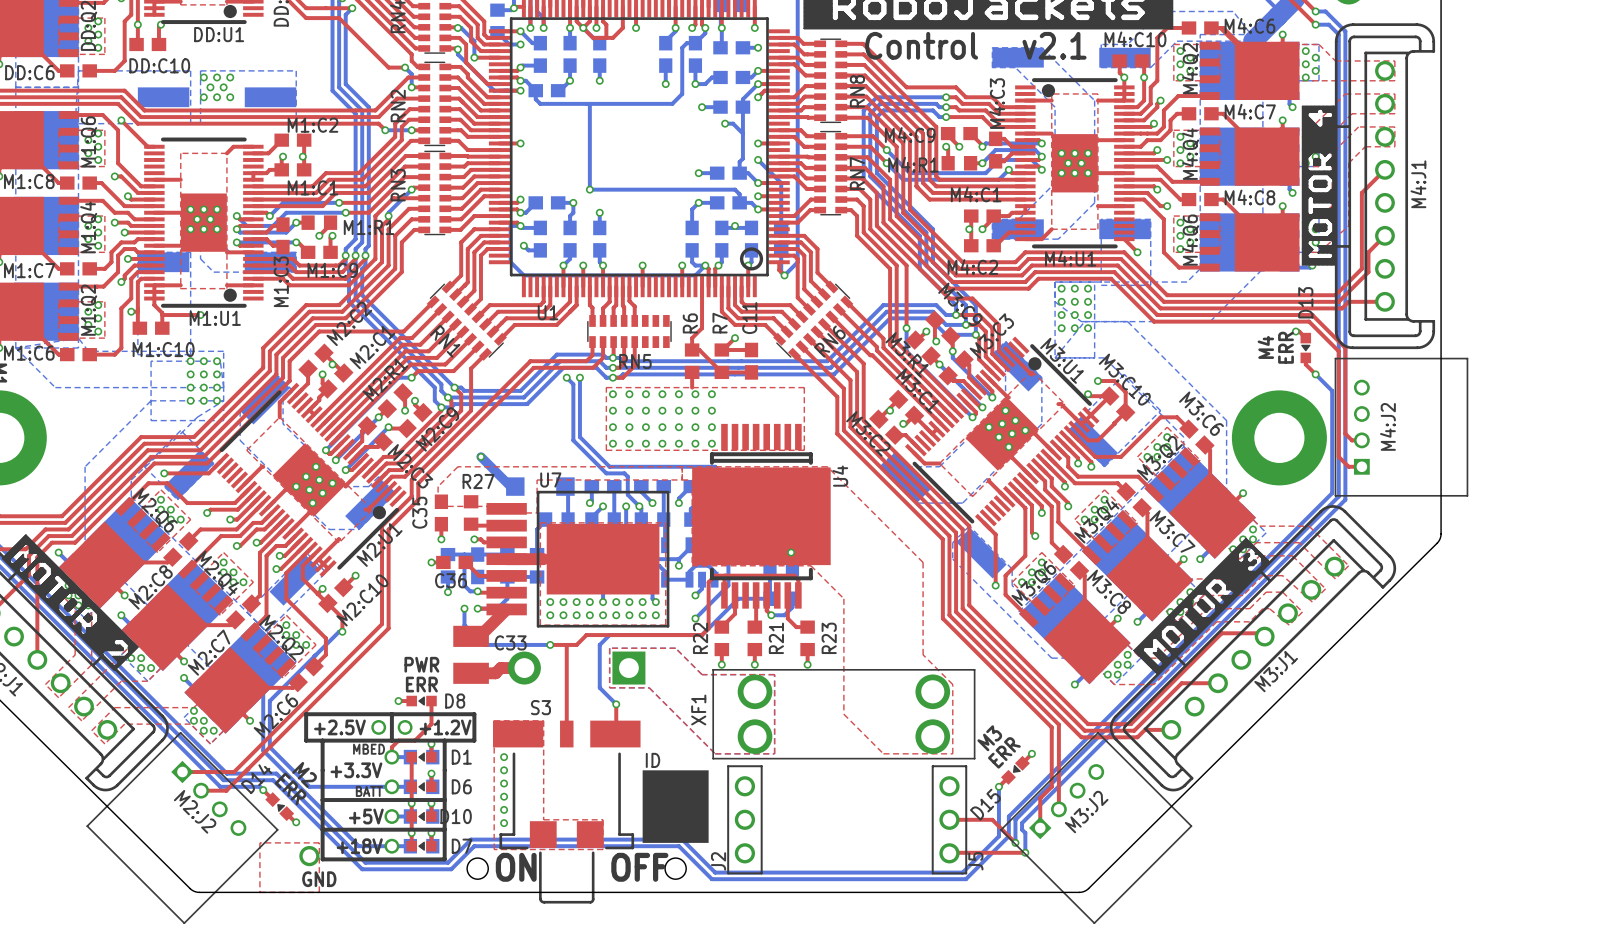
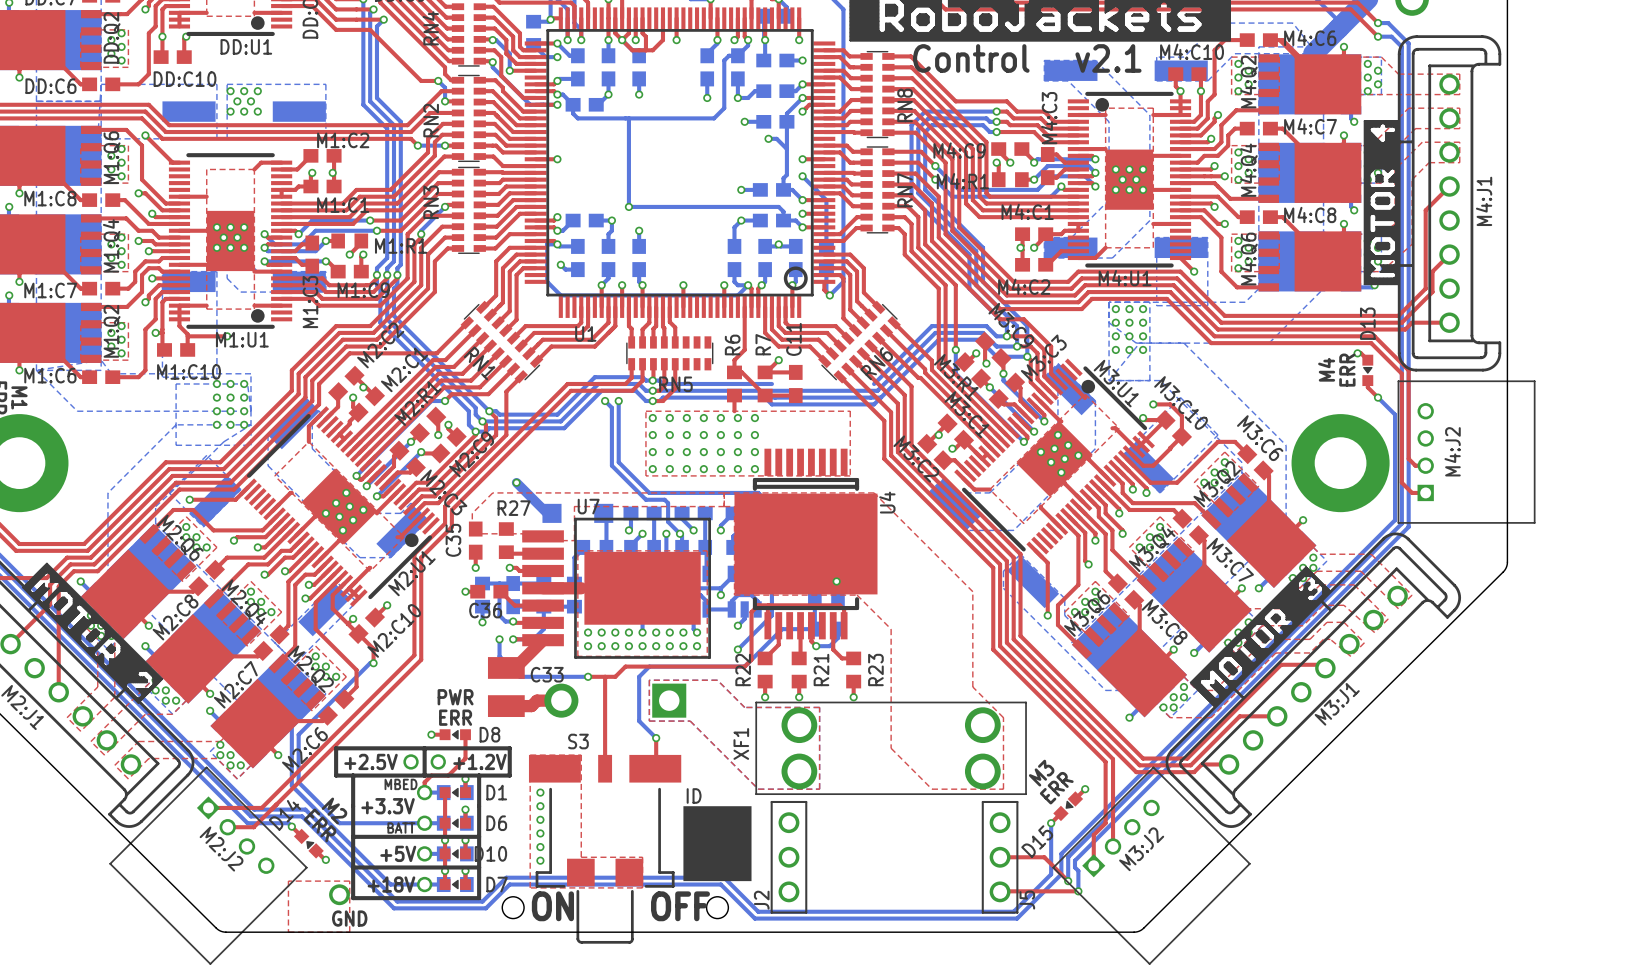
bottom track: (728, 361) (827, 361) -> none
bottom track: none -> (765, 397) (771, 404) (874, 404) (880, 397)

